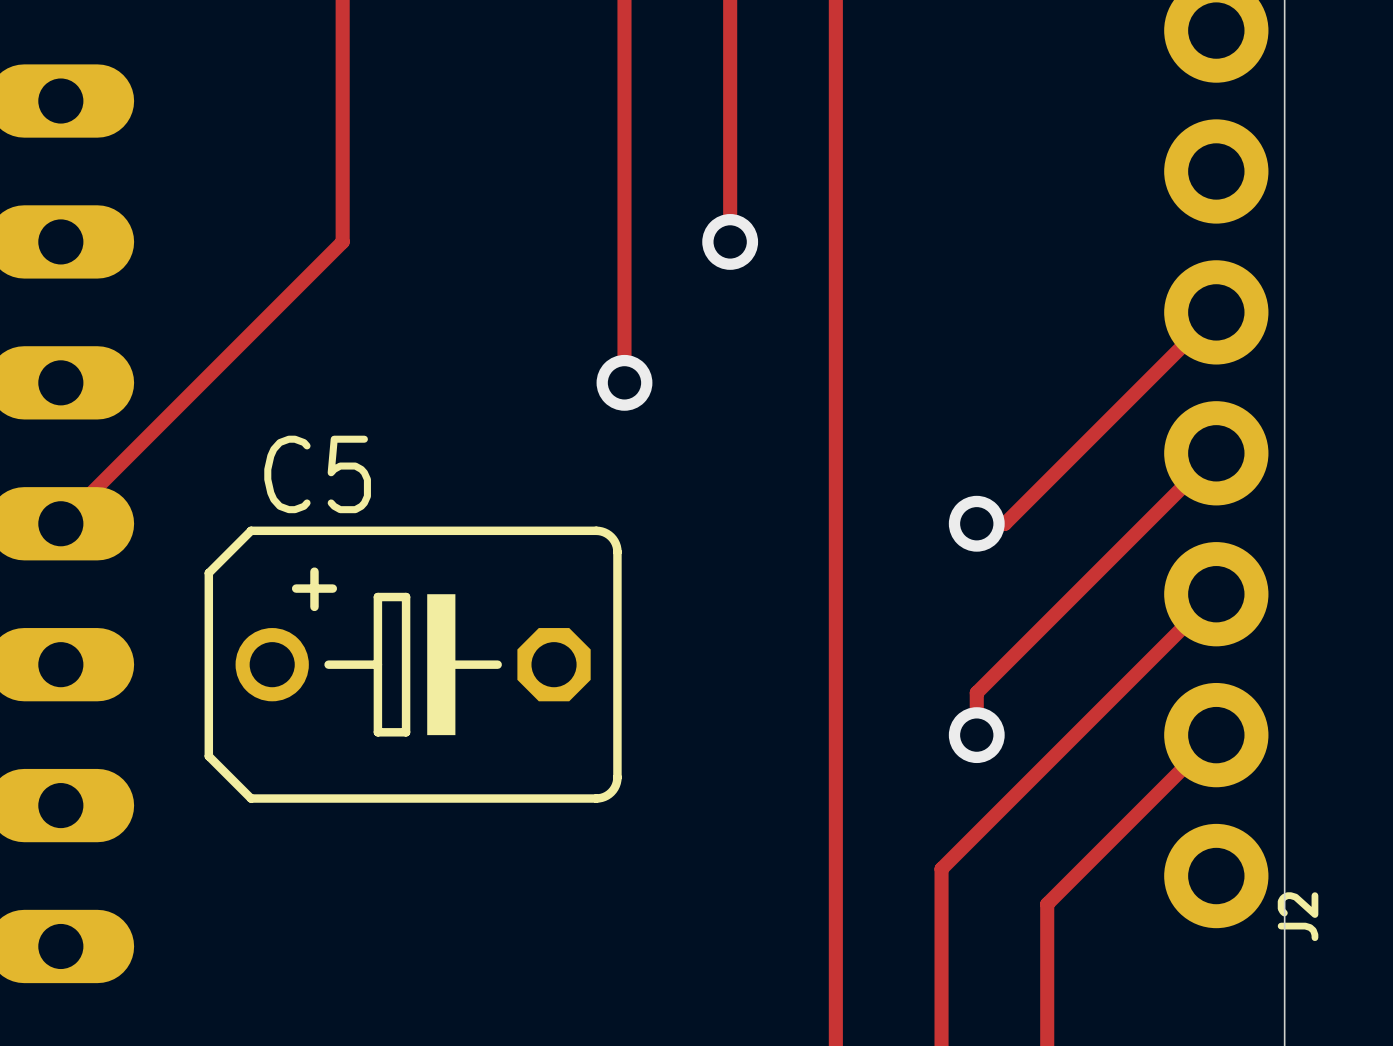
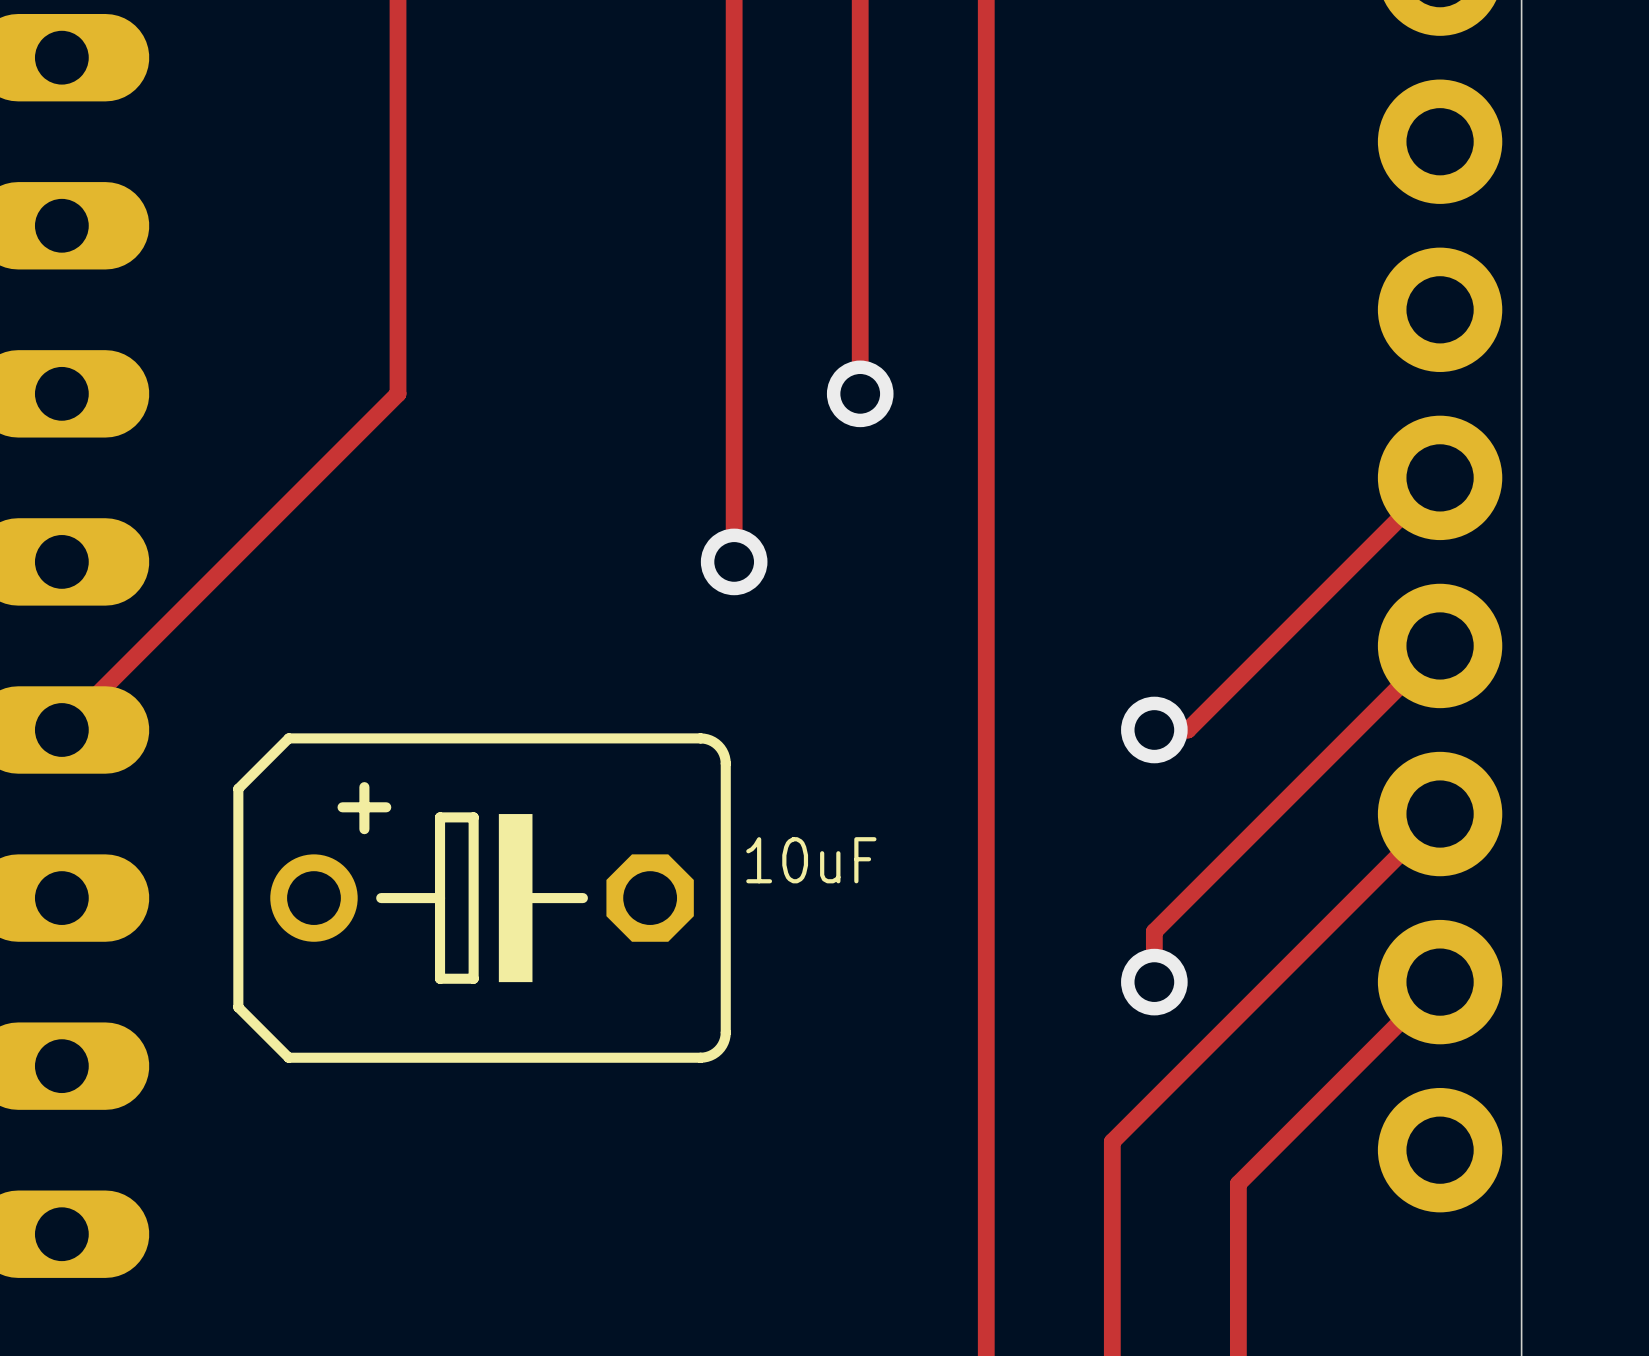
C5 name: C5 (317, 474) -> none
C5 value: none -> 10uF (811, 860)
J2 name: J2 (1298, 916) -> none

